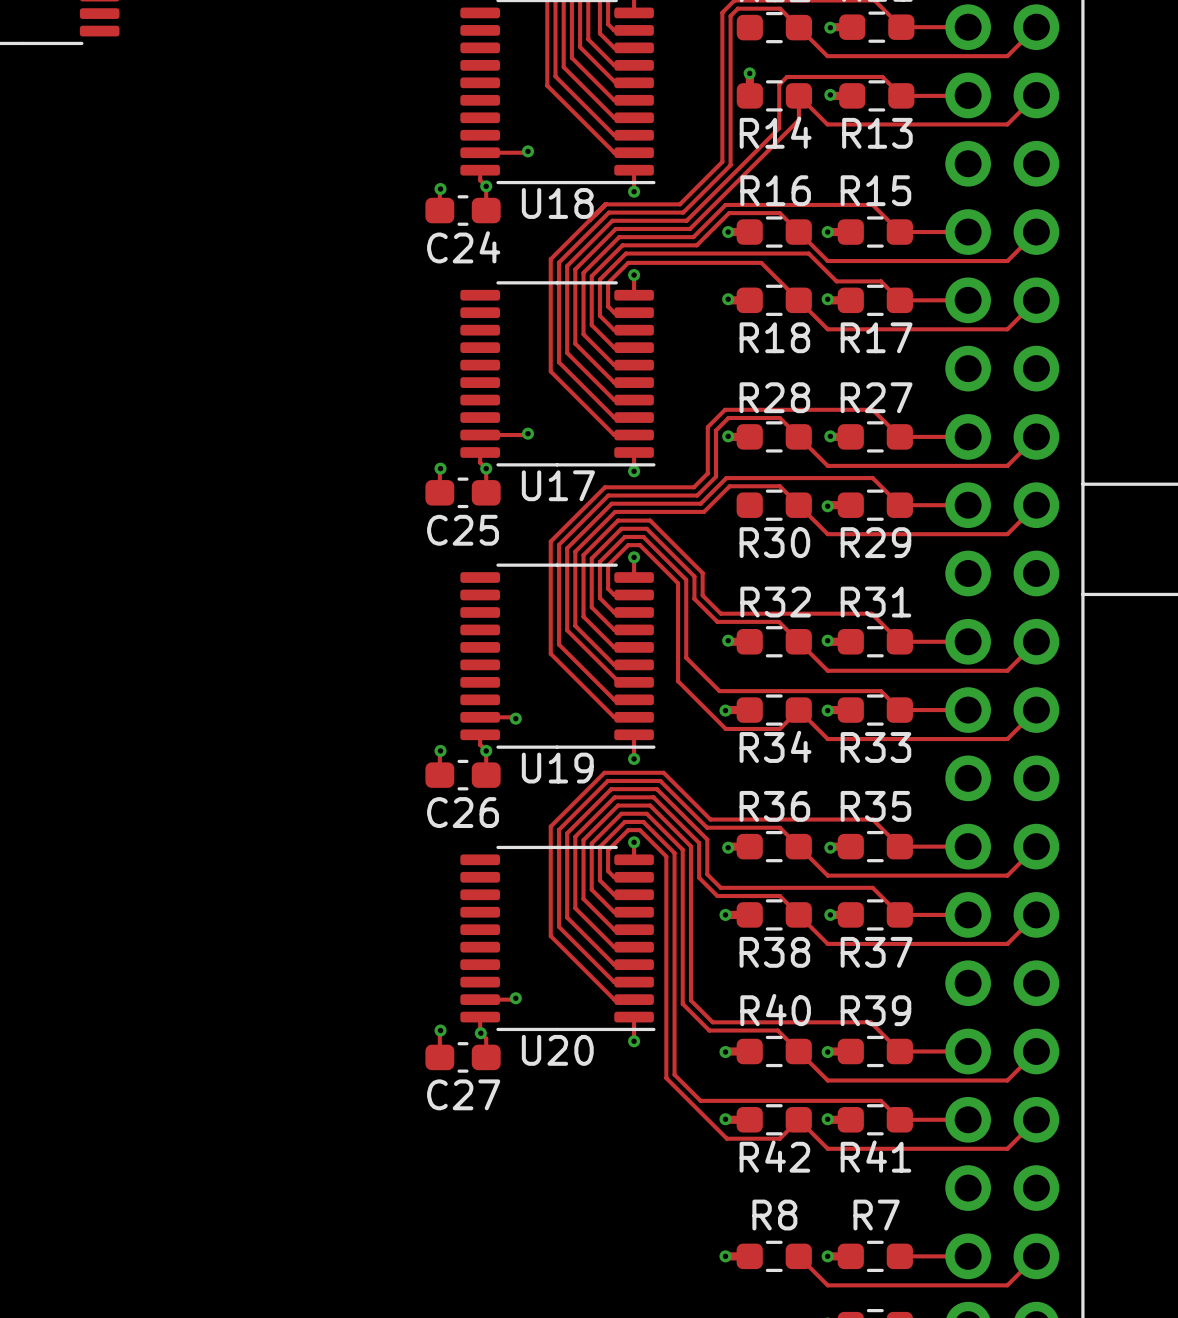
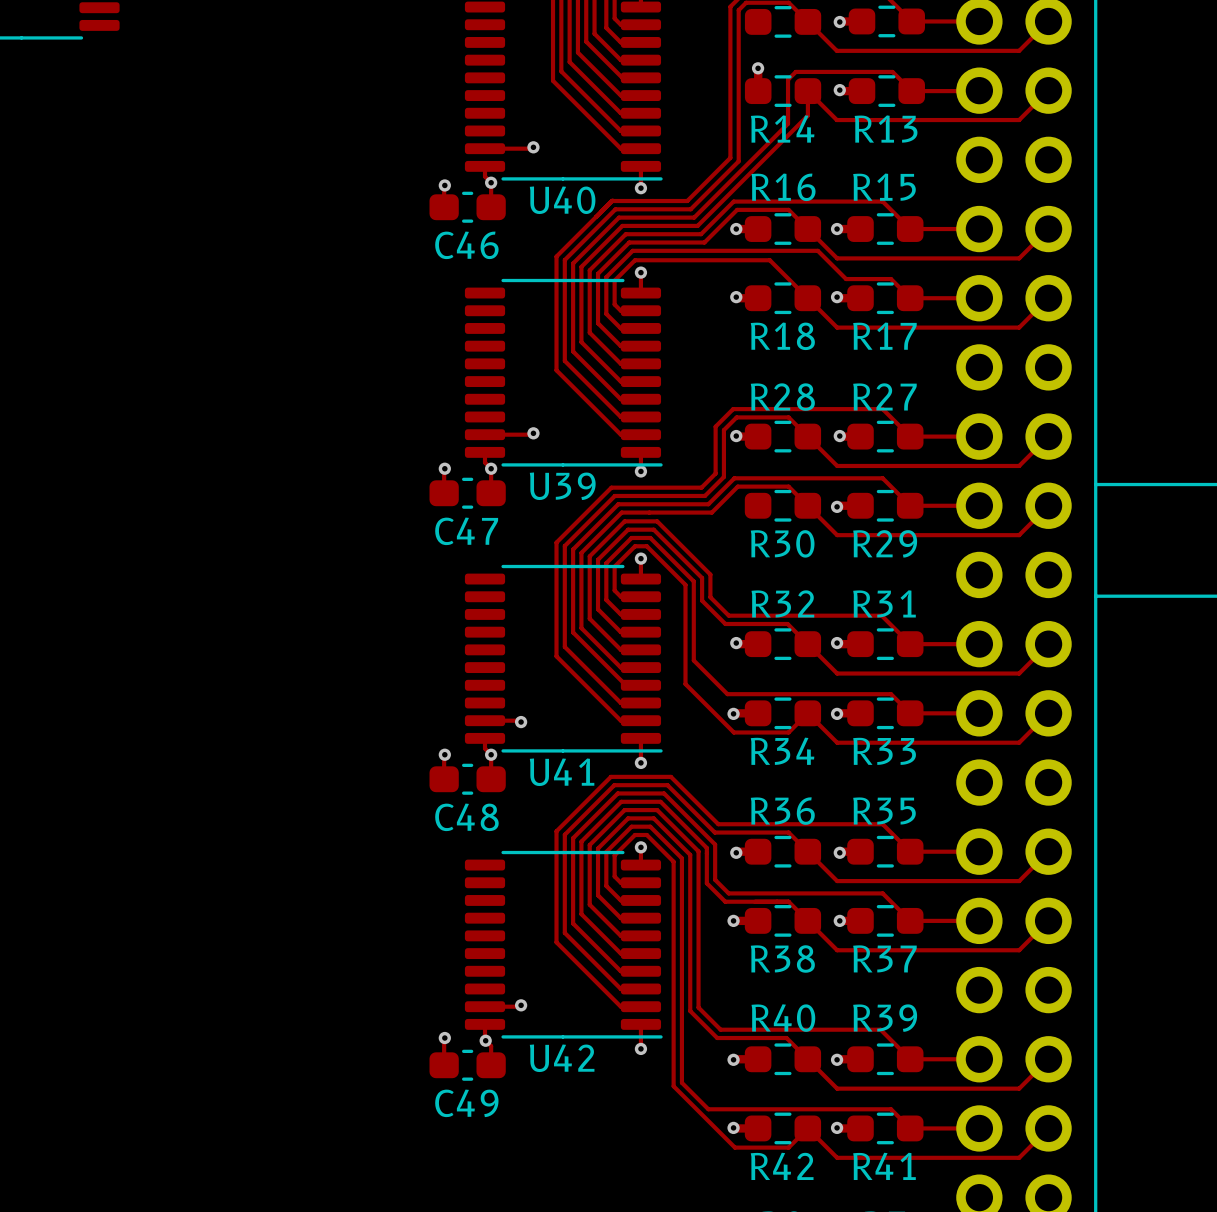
U18 name: U18 (557, 203) -> U40 (562, 200)
C24 name: C24 (463, 247) -> C46 (466, 245)
U17 name: U17 (558, 485) -> U39 (562, 486)
C25 name: C25 (463, 530) -> C47 (466, 531)
U19 name: U19 (557, 768) -> U41 (562, 772)
C26 name: C26 (463, 812) -> C48 (466, 817)
U20 name: U20 (557, 1050) -> U42 (562, 1058)
C27 name: C27 (463, 1094) -> C49 (466, 1103)

